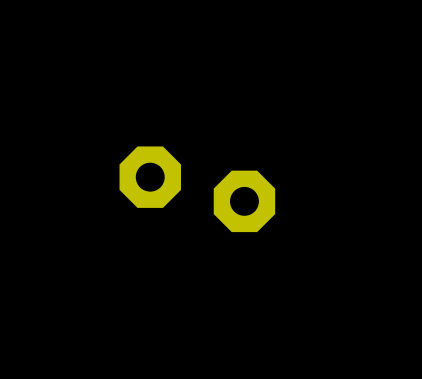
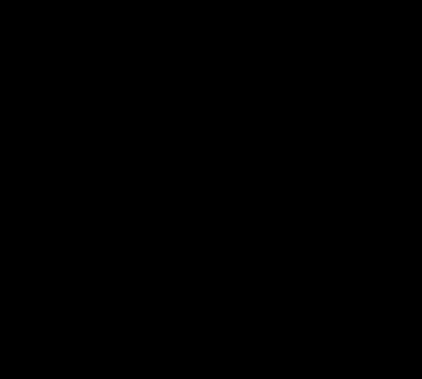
part: (150, 177) -> none
part: (244, 201) -> none

